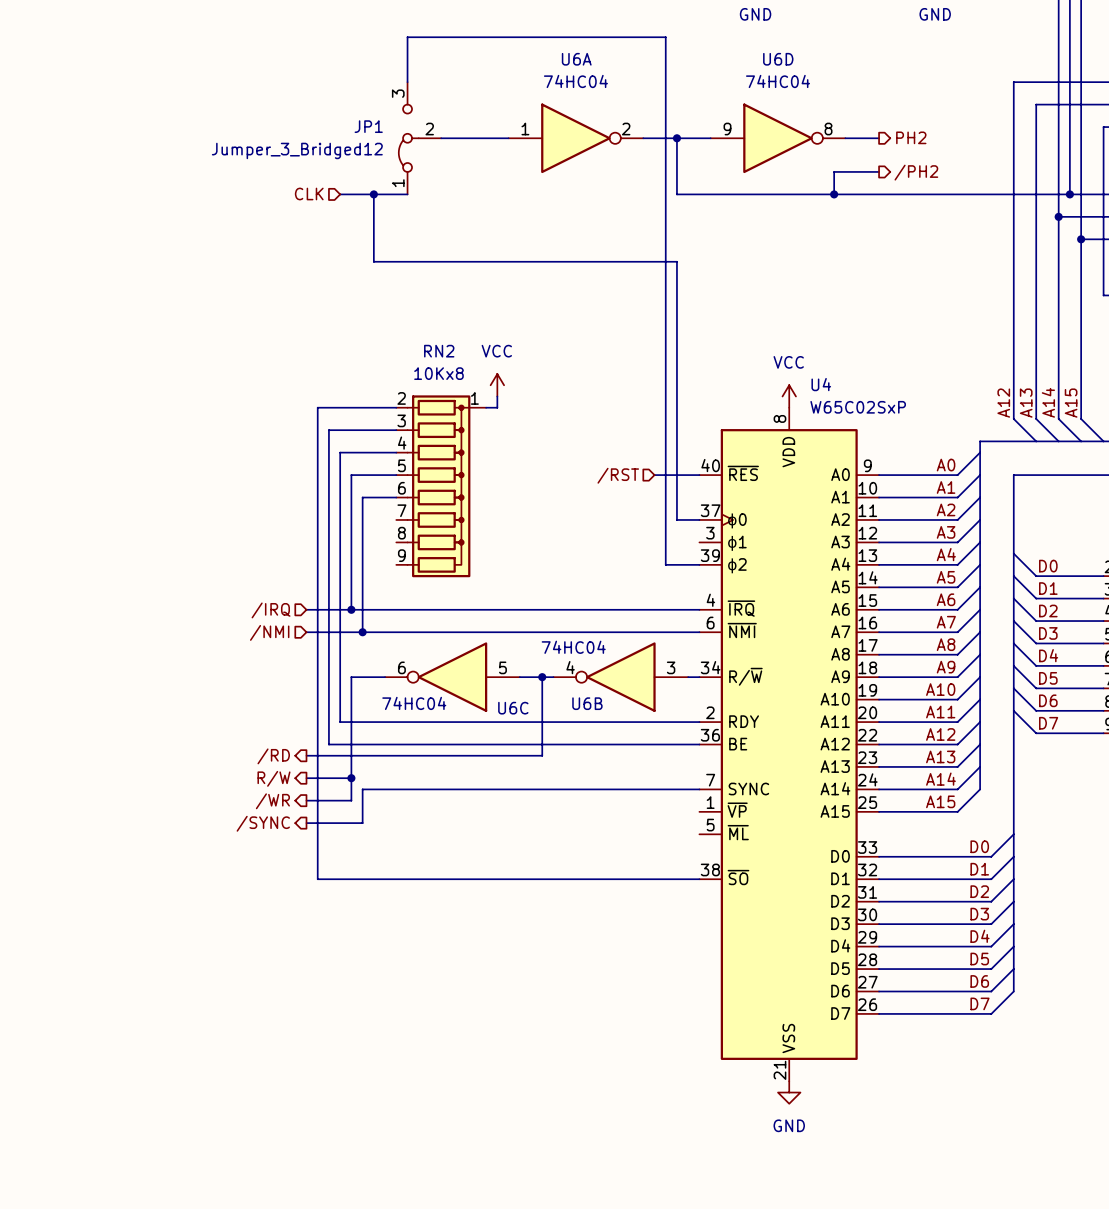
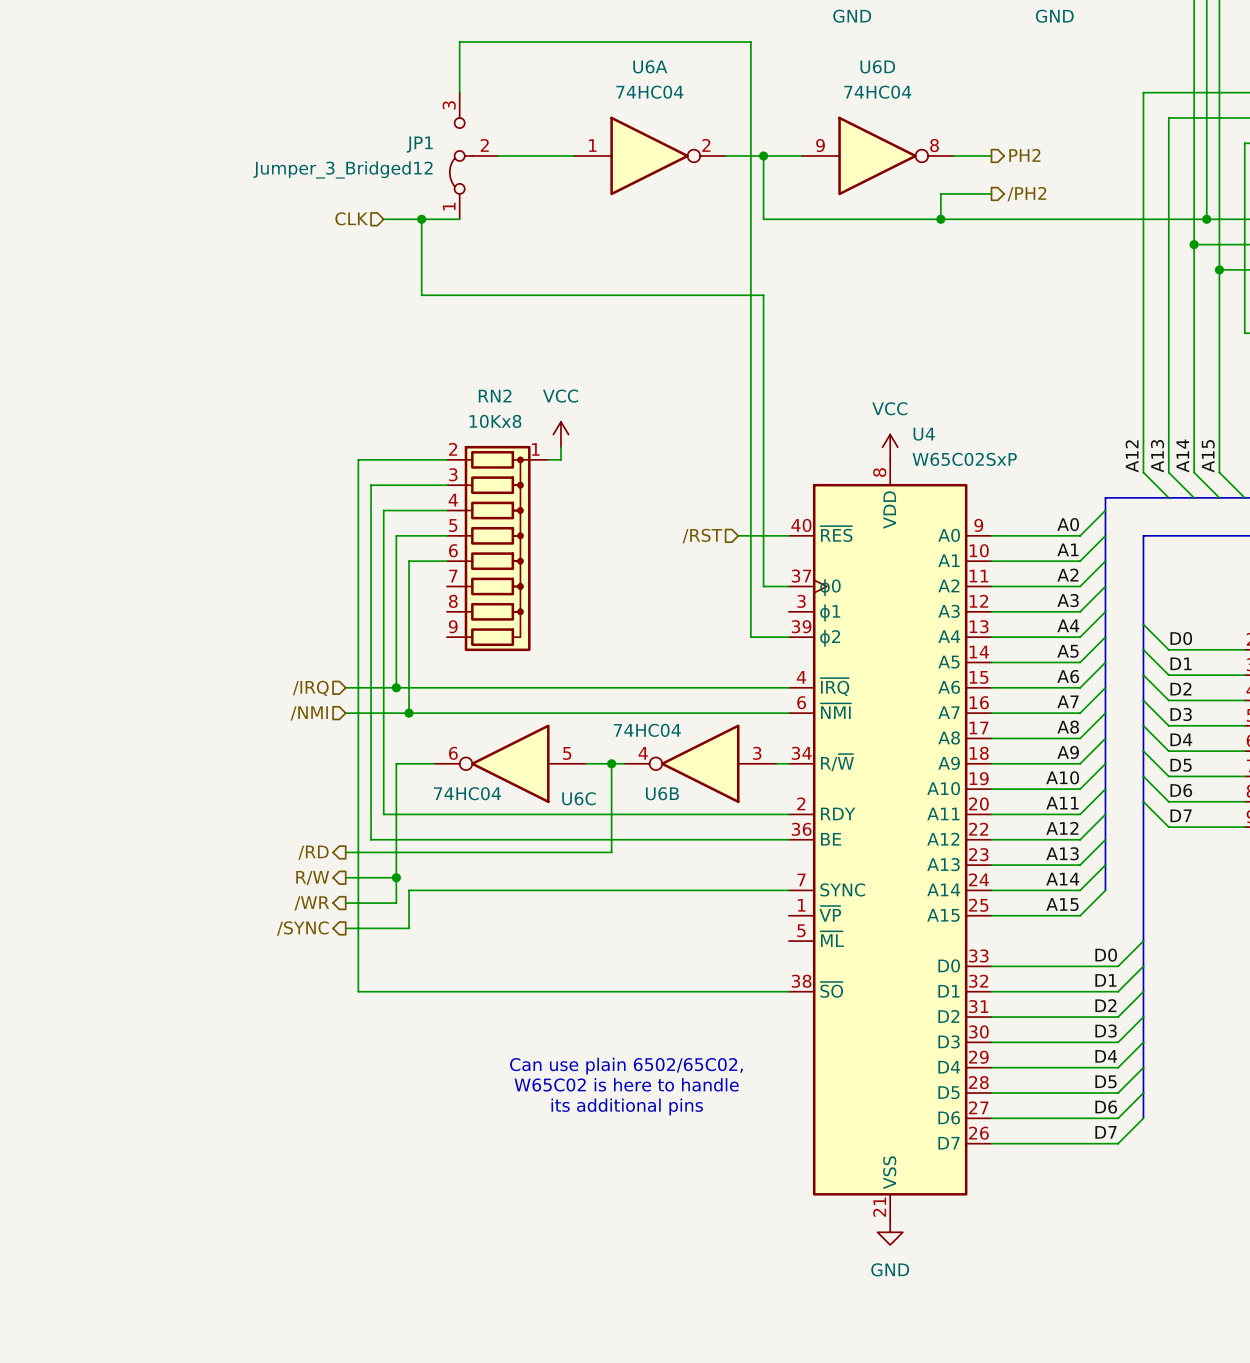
text: none -> Can use plain 6502/65C02, (626, 1066)
text: none -> W65C02 is here to handle (626, 1084)
text: none -> its additional pins (627, 1106)

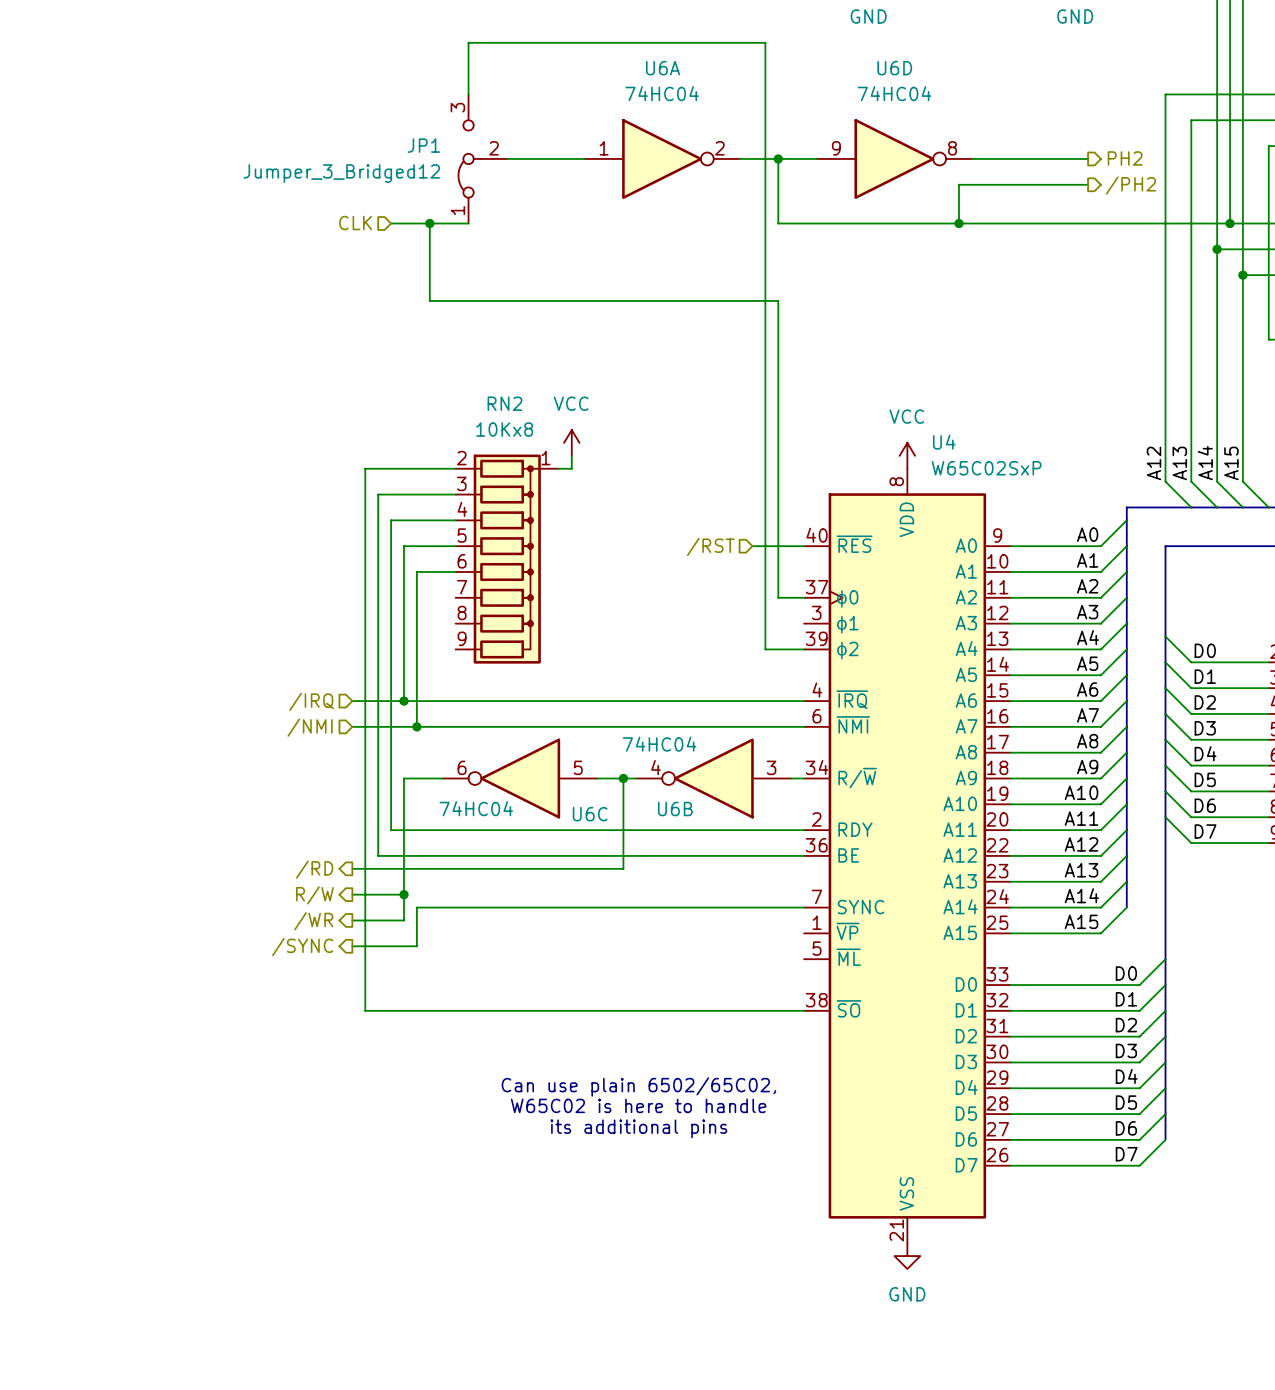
wire: none -> (1010, 158) (1088, 158)
hierarchical label position: PH2 (1024, 155) -> PH2 (1125, 158)
wire: (940, 193) (991, 193) -> (958, 197) (958, 184) (1088, 184)
hierarchical label position: /PH2 (1026, 194) -> /PH2 (1130, 185)

